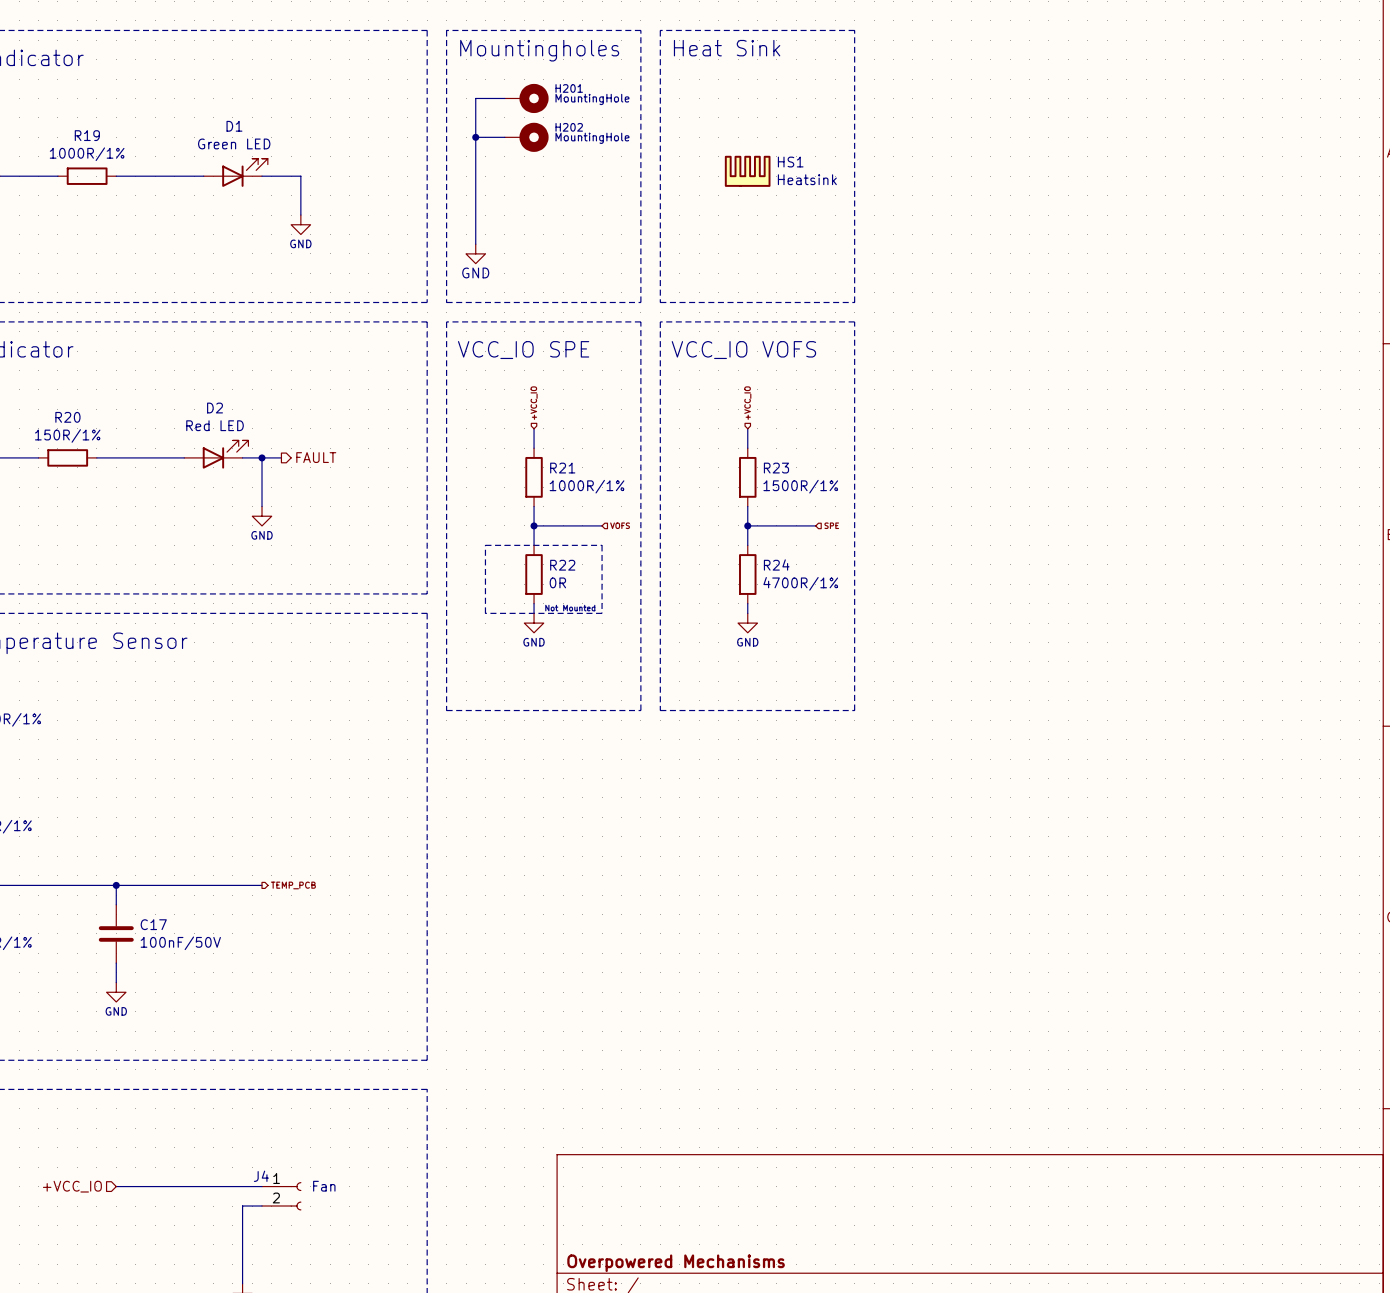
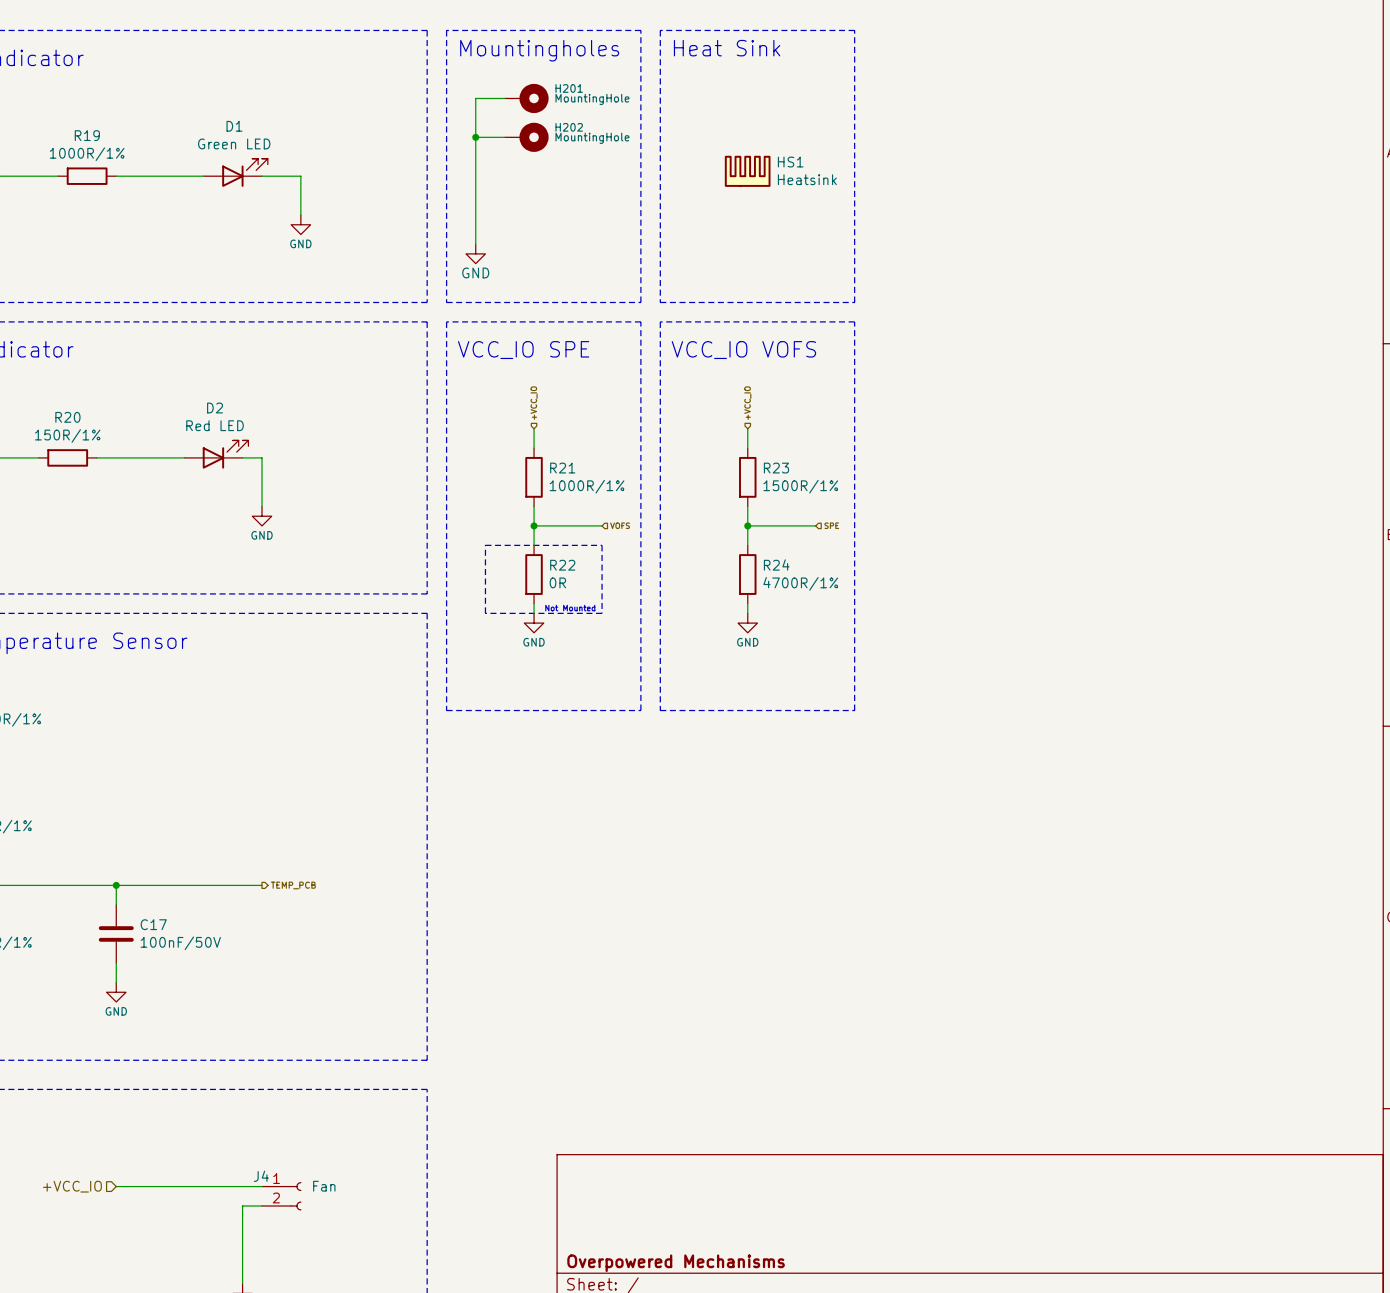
wire: (262, 457) (281, 457) -> none
junction: (262, 457) -> none
hierarchical label: FAULT (316, 457) -> none

